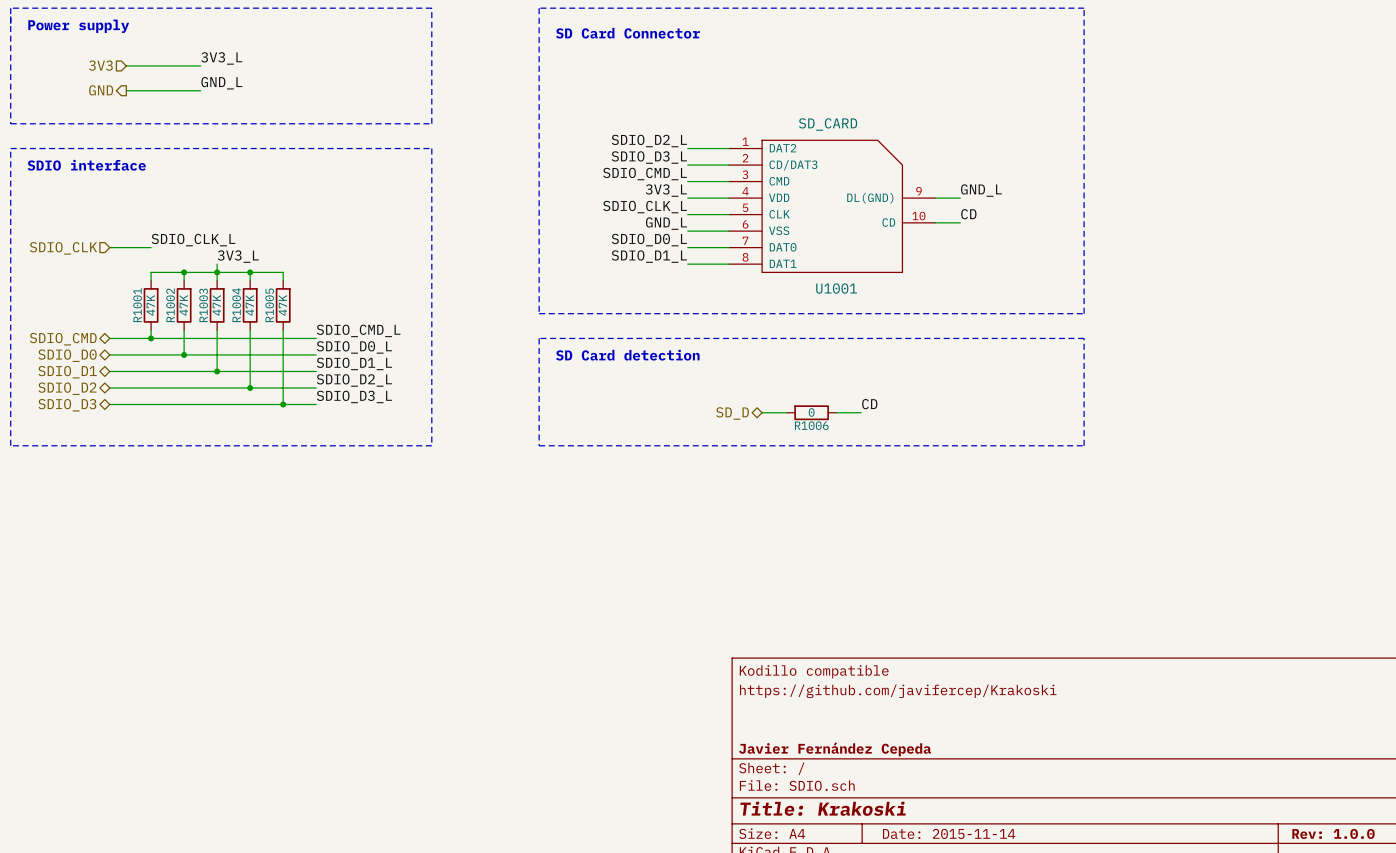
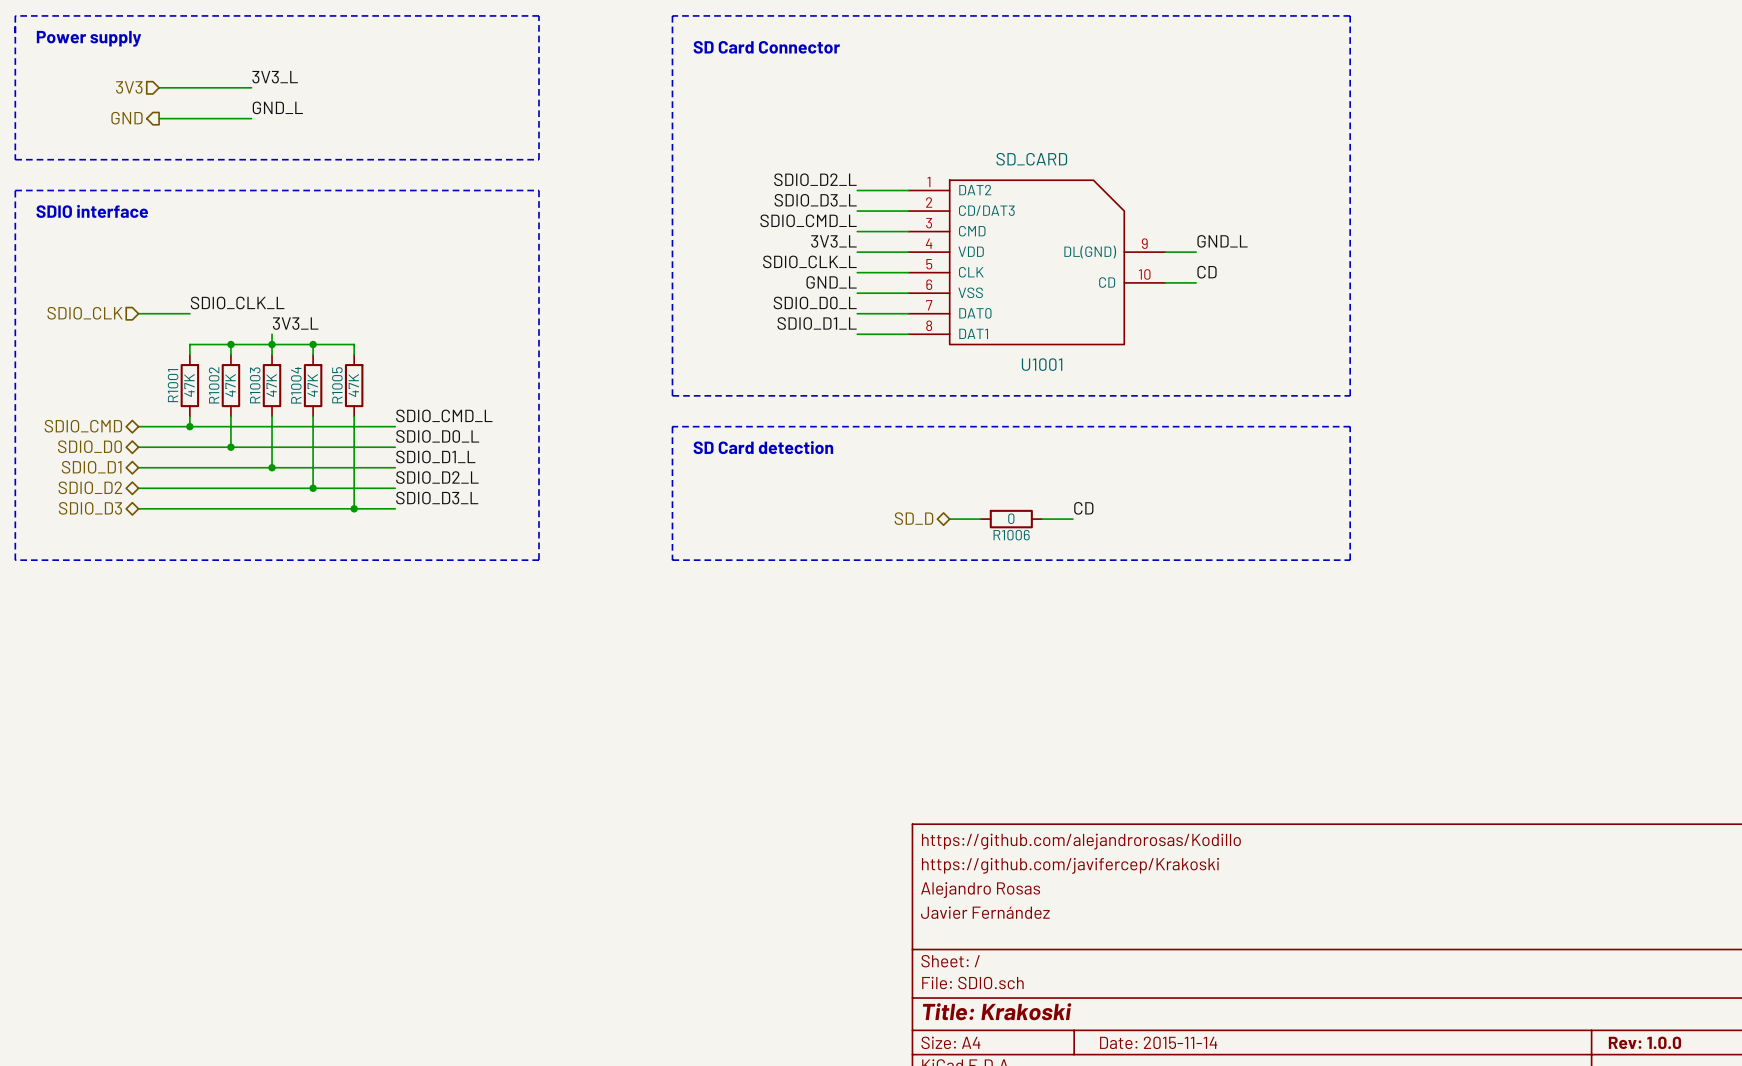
title block: Kodillo compatible (814, 671) -> https://github.com/alejandrorosas/Kodillo (1081, 841)
title block: none -> Alejandro Rosas (980, 890)
title block: Javier Fernández Cepeda (835, 749) -> Javier Fernández (985, 912)

